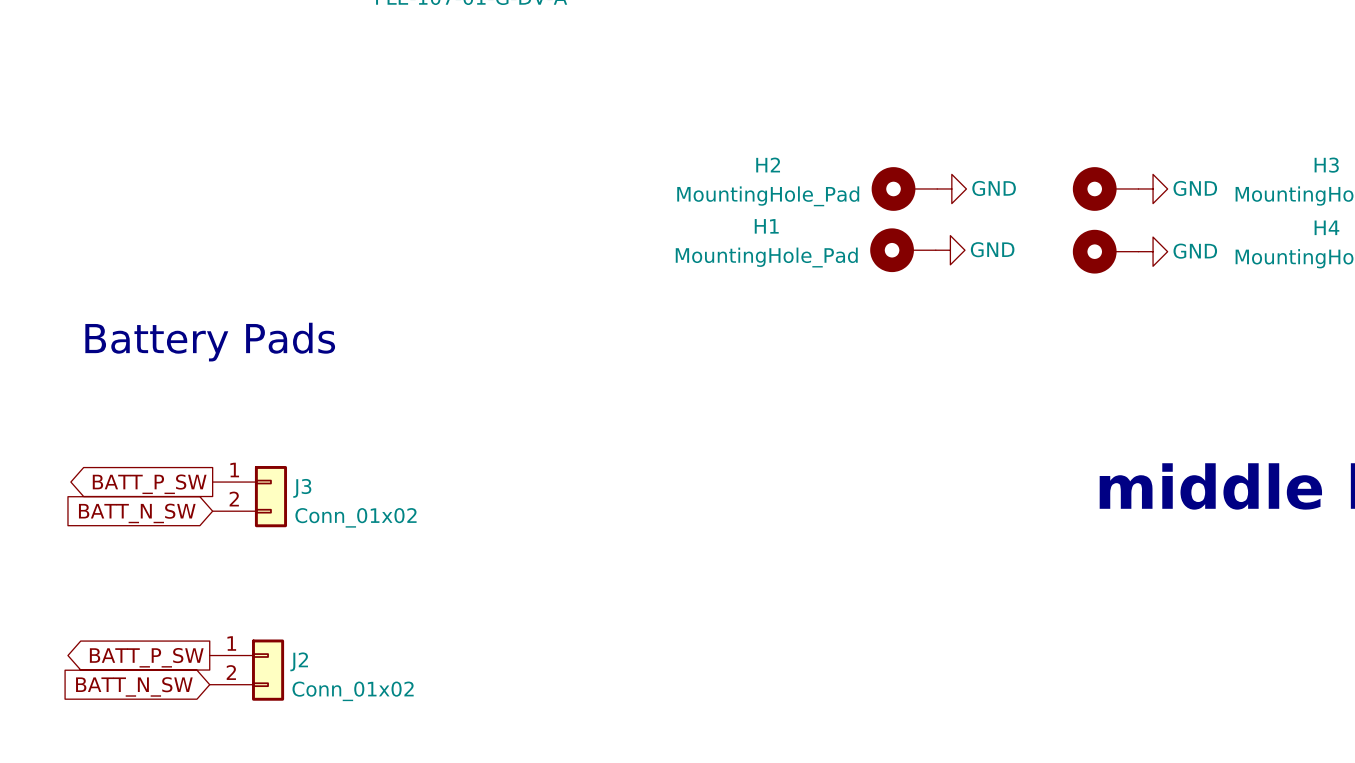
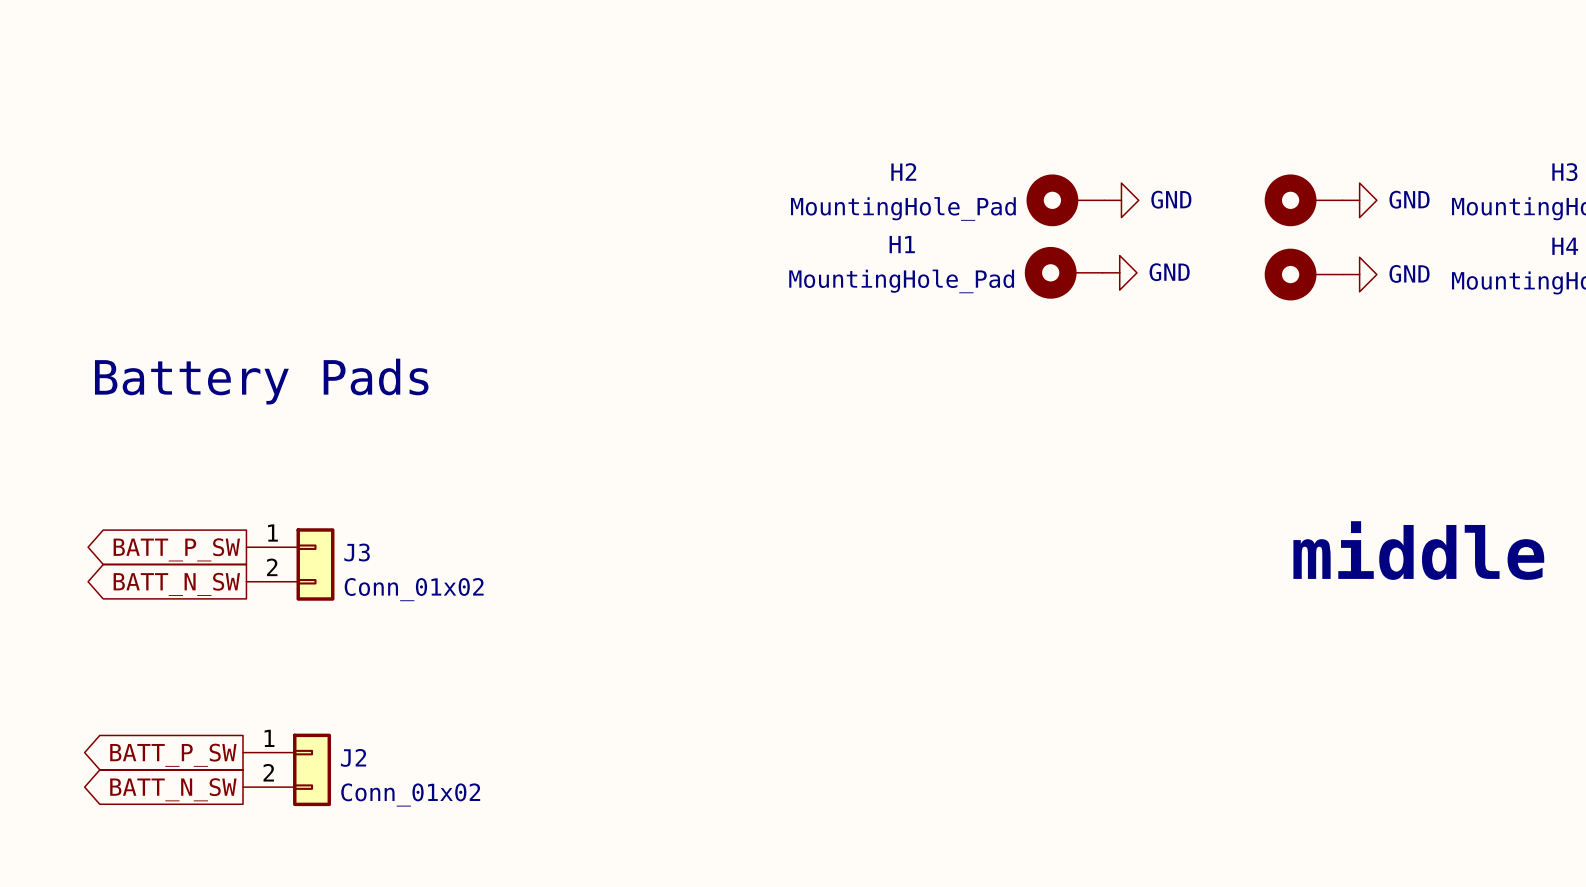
global label shape: input (137, 513) -> output (176, 584)
global label shape: input (134, 686) -> output (173, 789)

